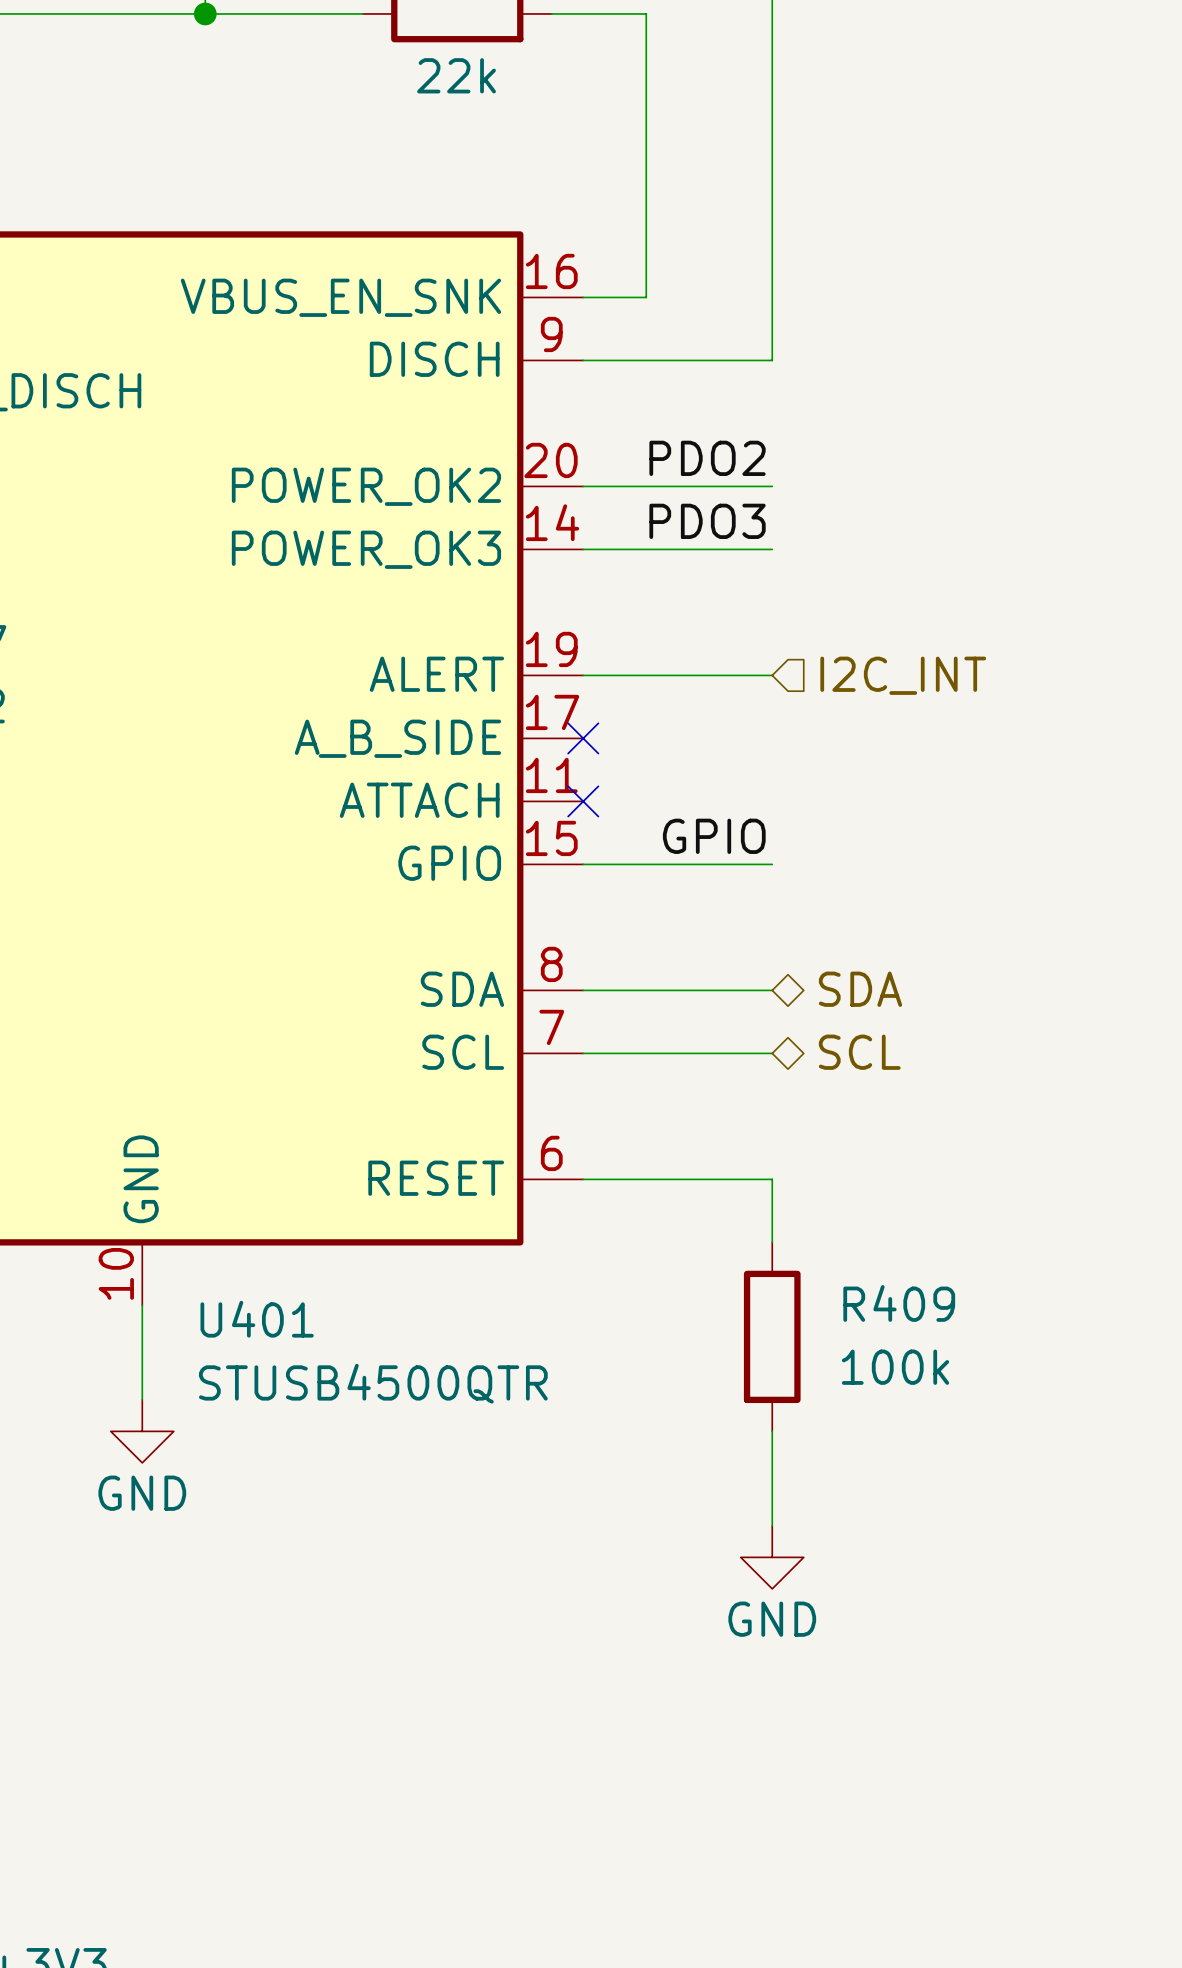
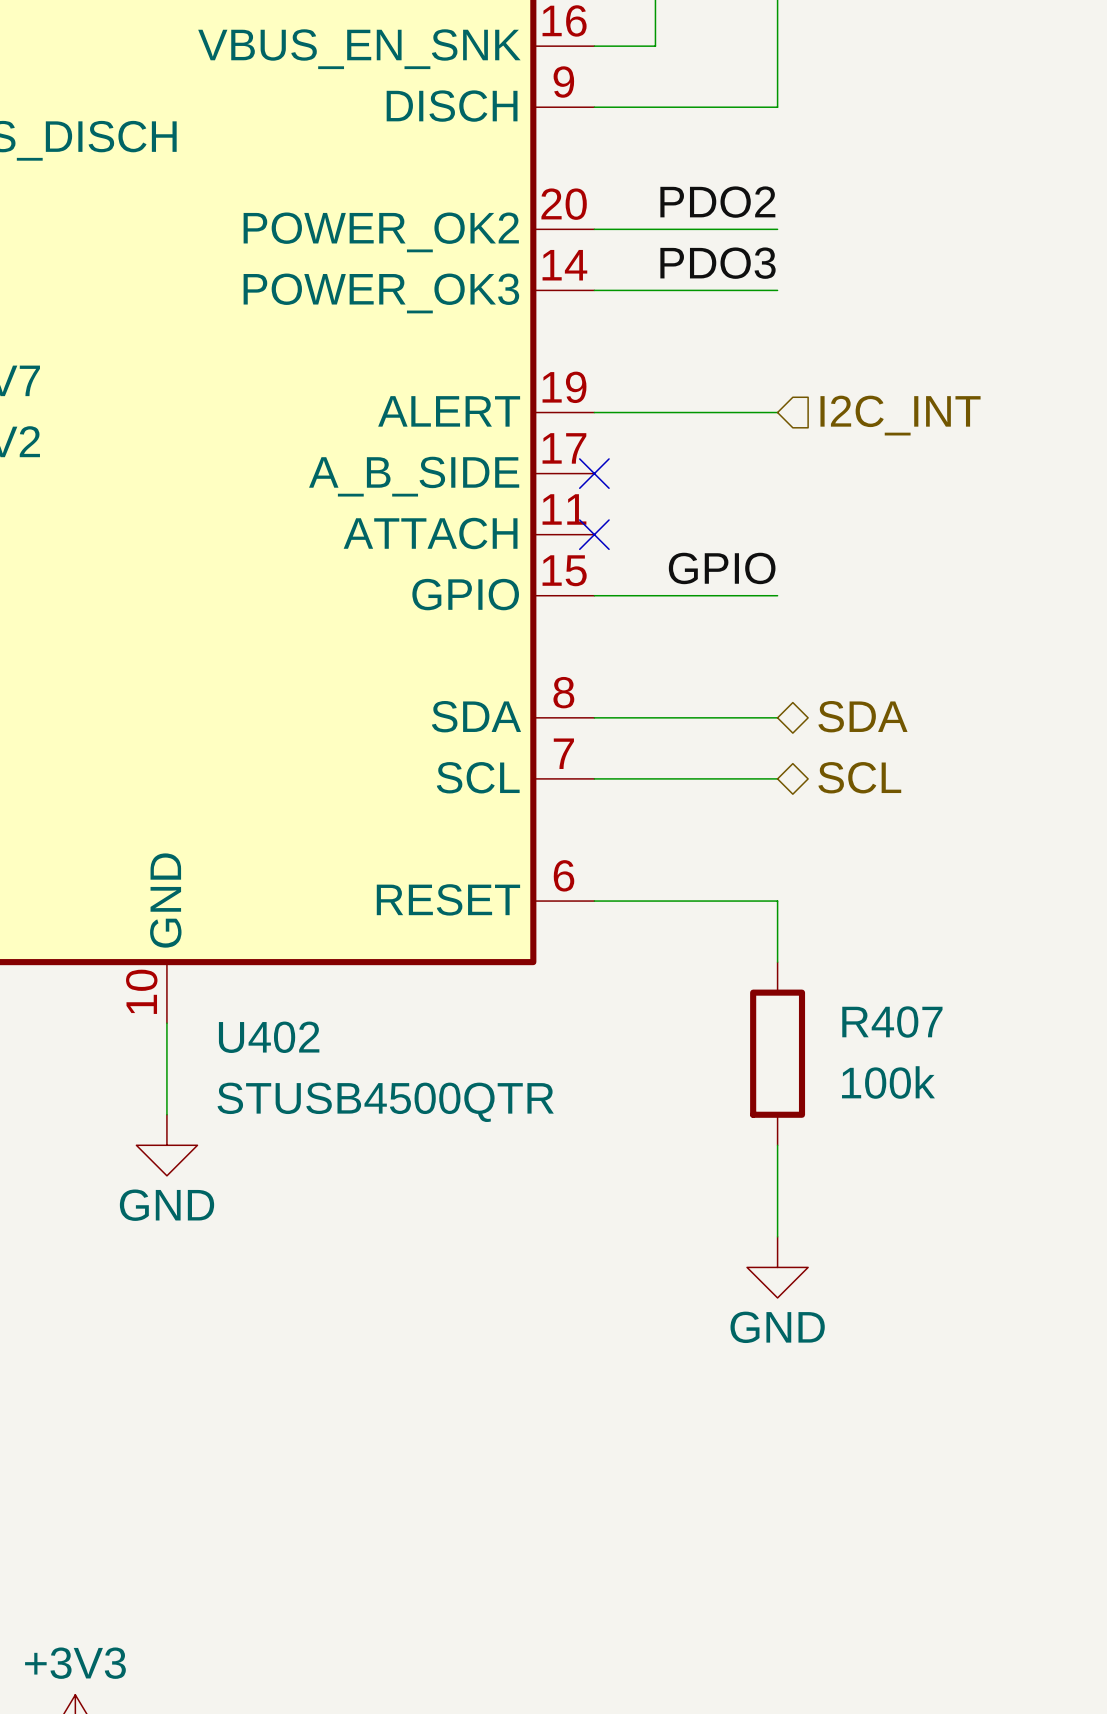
R409 name: R409 (899, 1303) -> R407 (892, 1022)
U401 name: U401 (257, 1319) -> U402 (269, 1037)

